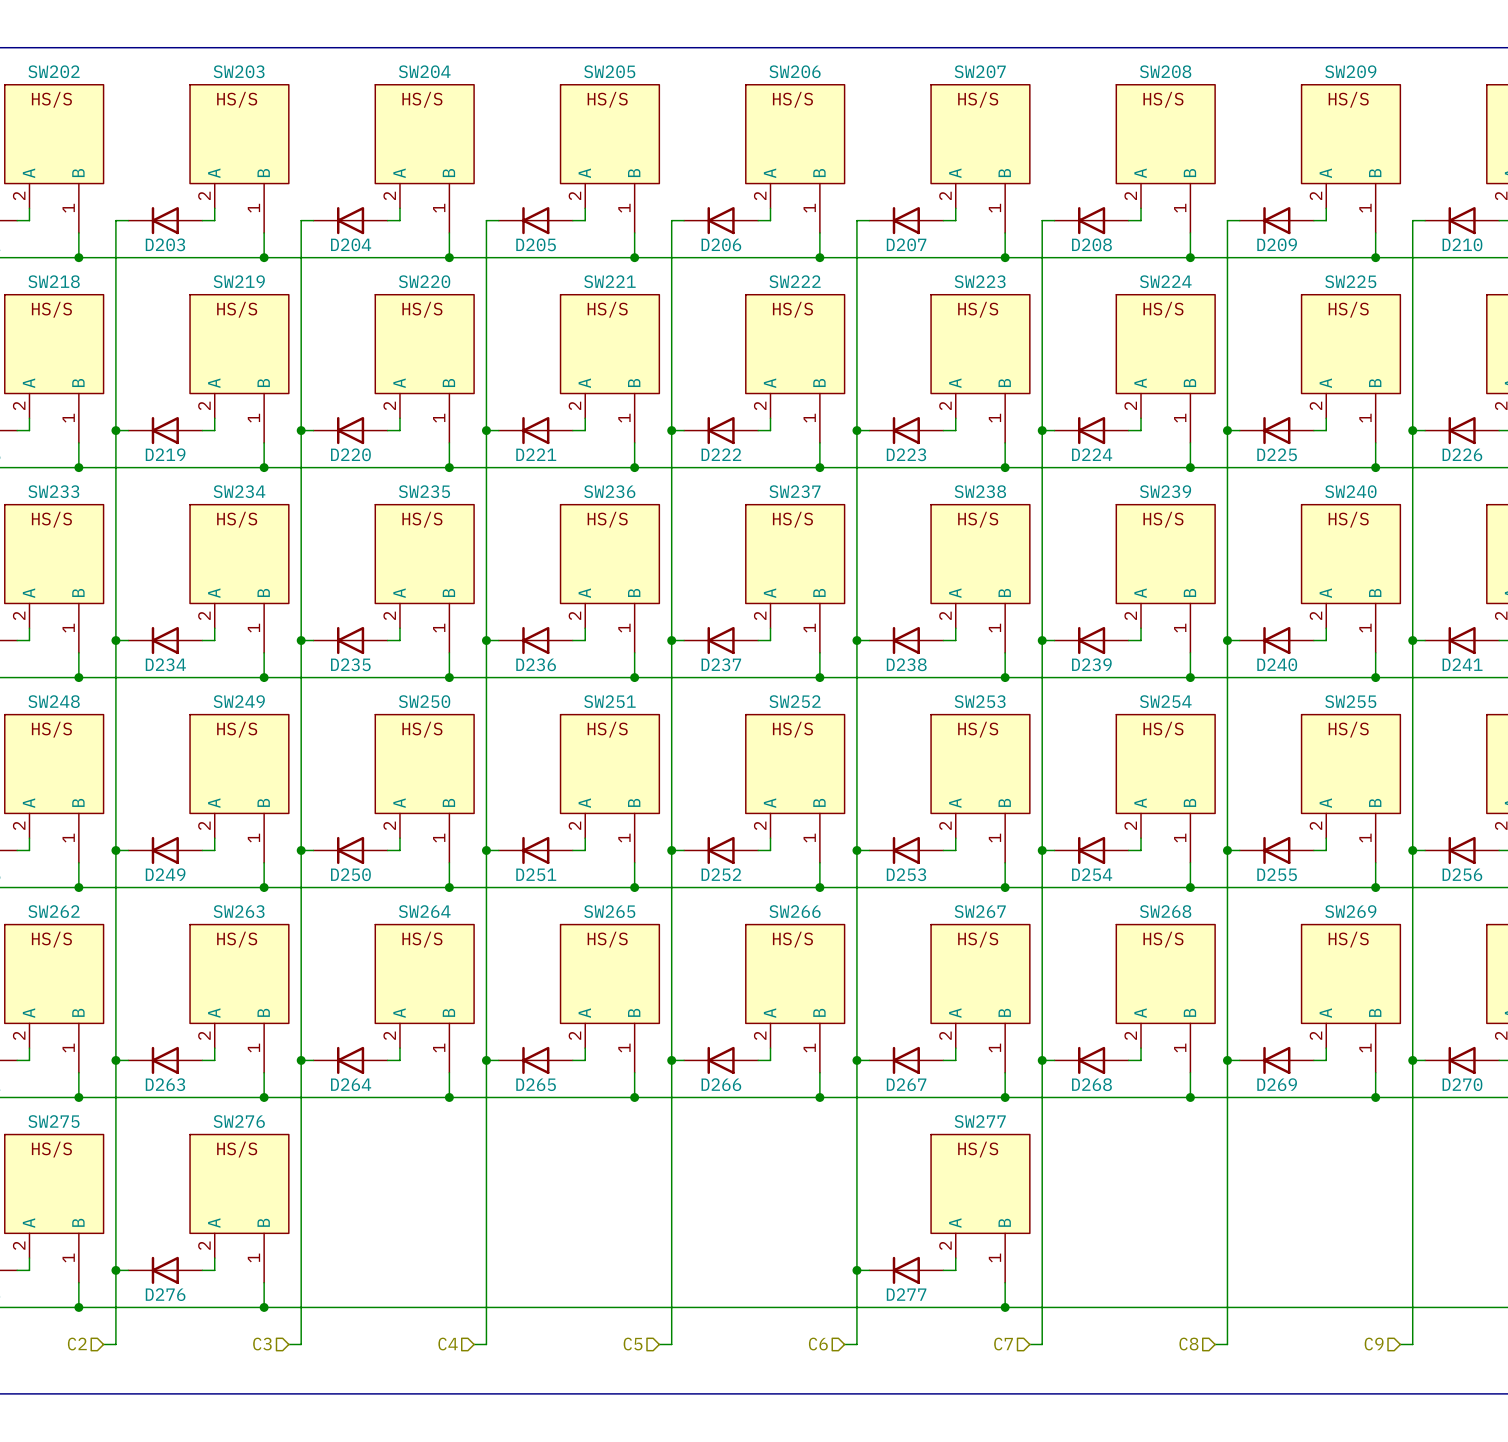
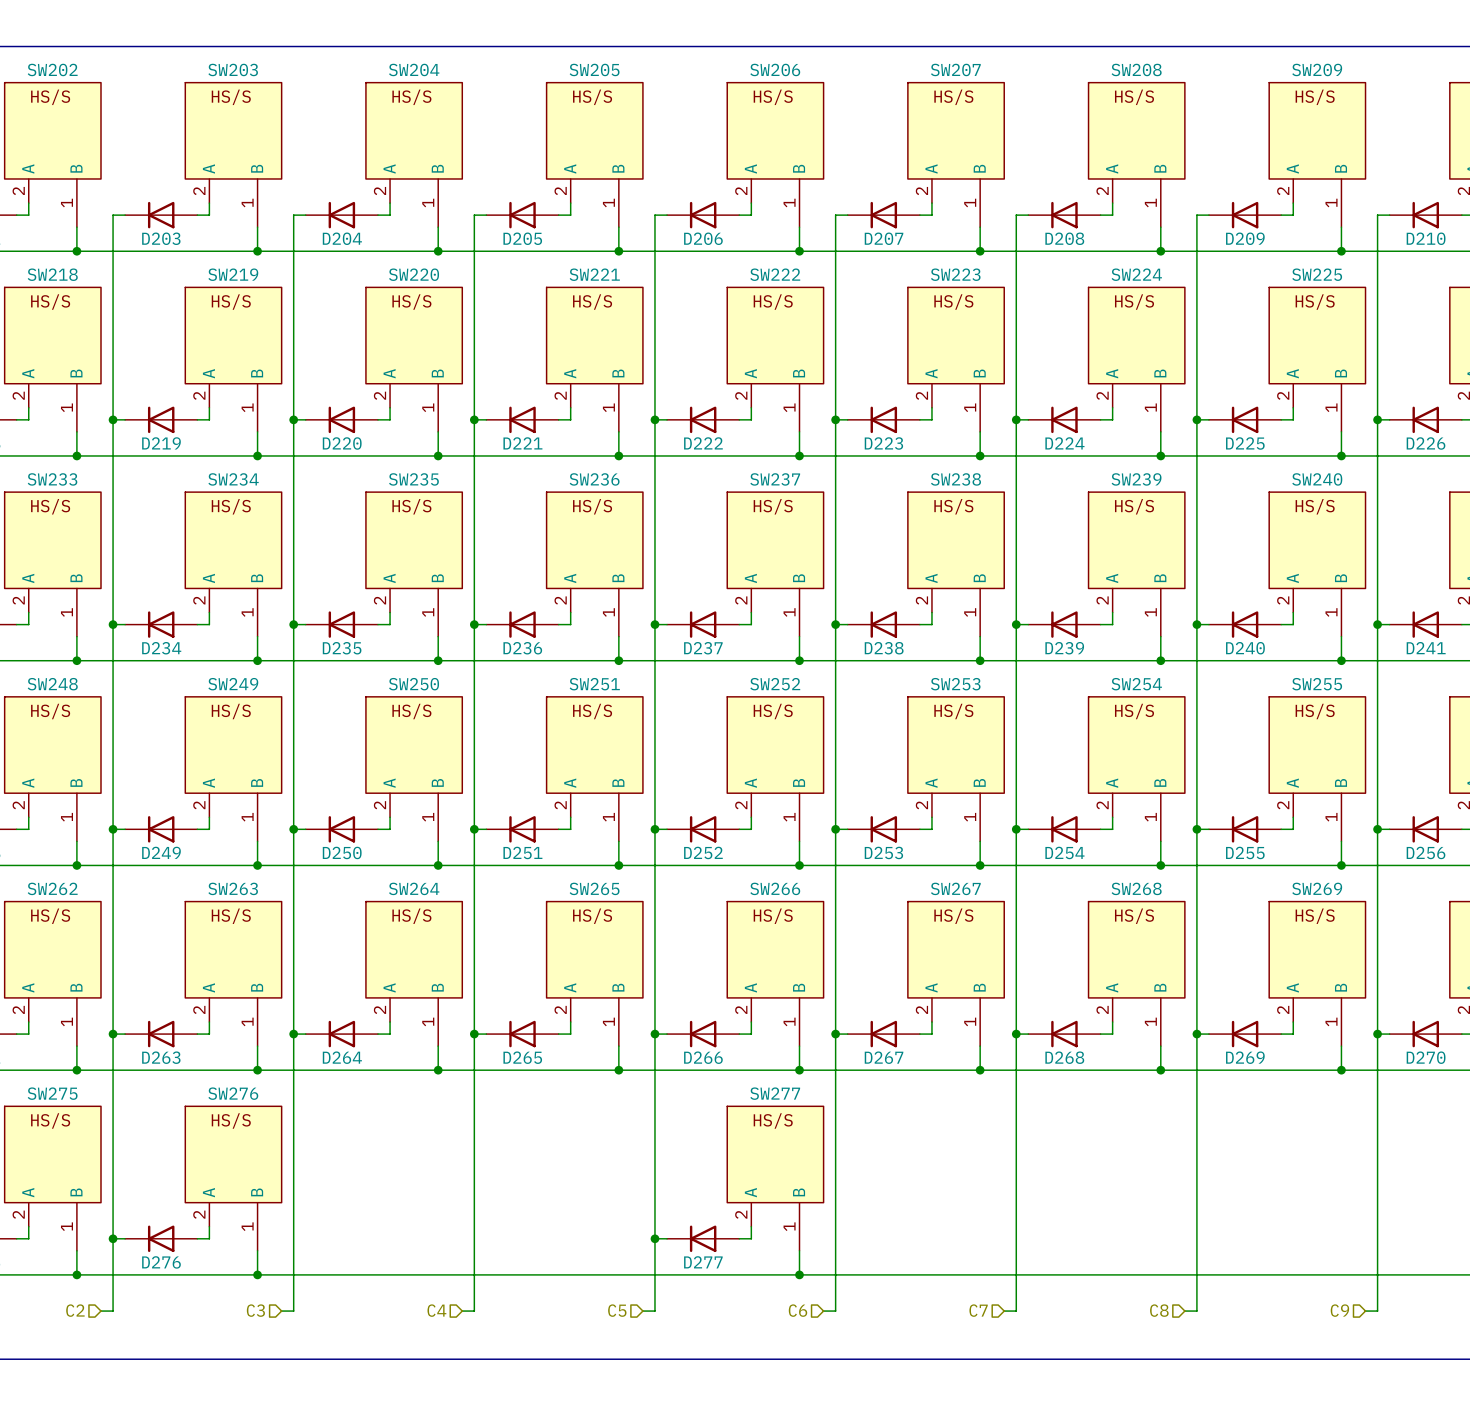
SW277 position: (980, 1208) -> (775, 1178)
wire: (955, 1258) (955, 1270) (943, 1270) -> (751, 1226) (751, 1238) (739, 1238)
junction: none -> (654, 1238)
wire: (856, 1270) (869, 1270) -> (654, 1238) (667, 1238)
junction position: (856, 1270) -> (799, 1274)
D277 position: (906, 1270) -> (703, 1238)
wire: (1005, 1282) (1005, 1307) -> (799, 1250) (799, 1274)
junction: (1005, 1307) -> none

